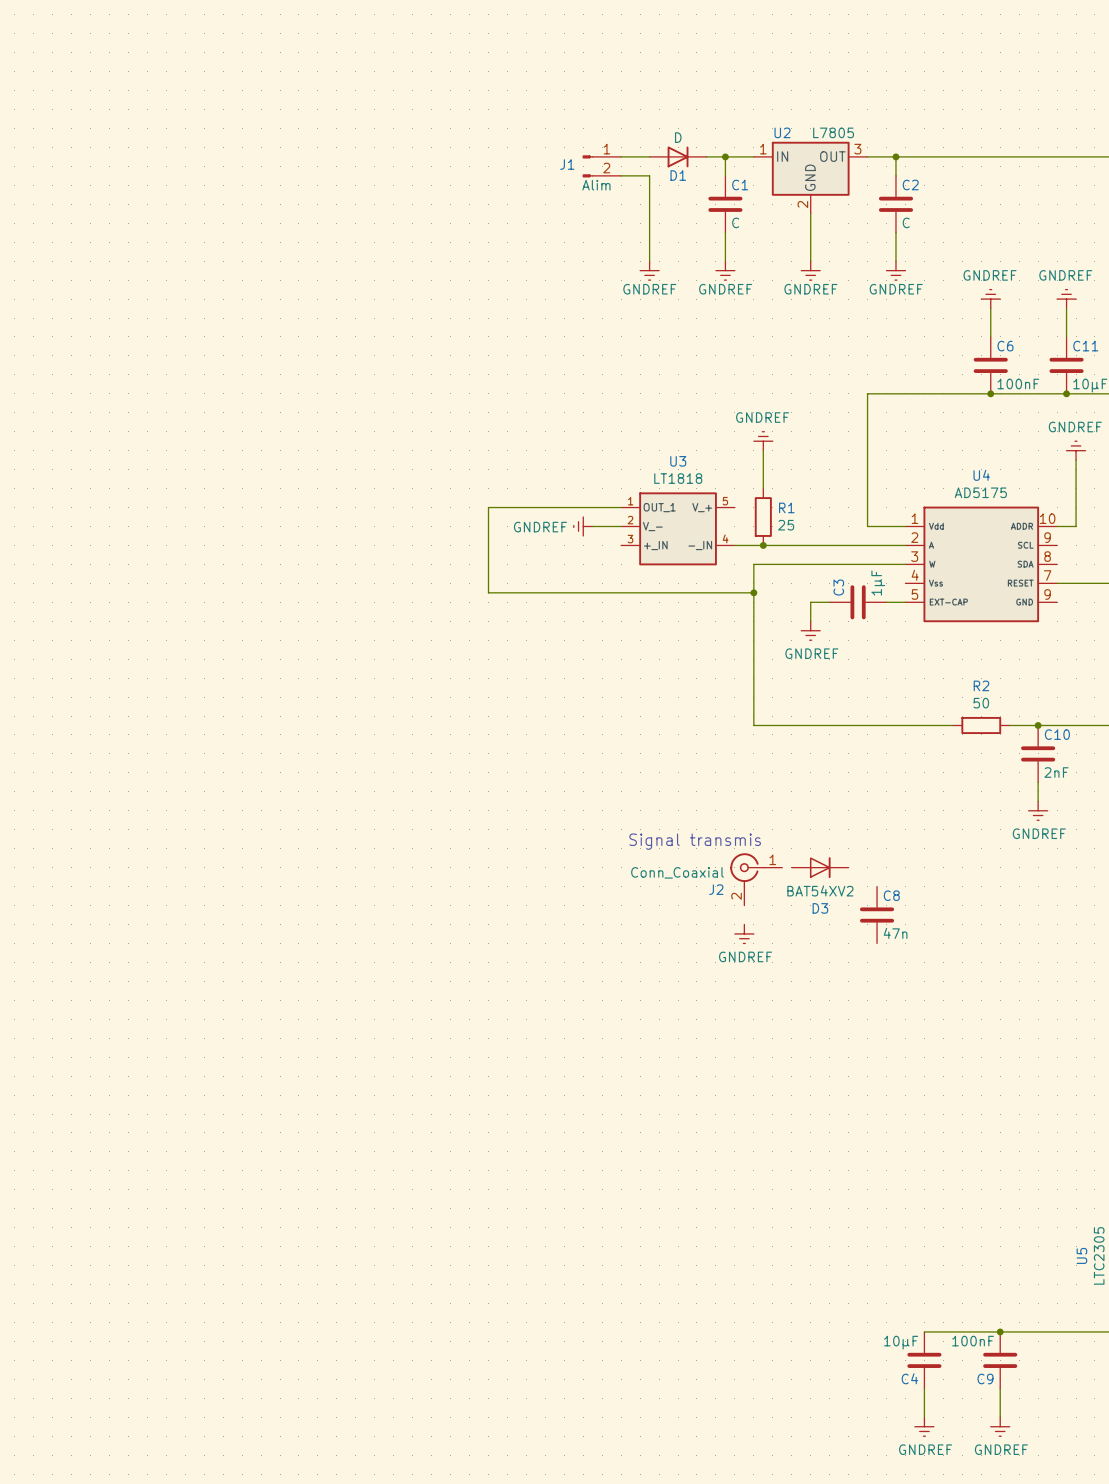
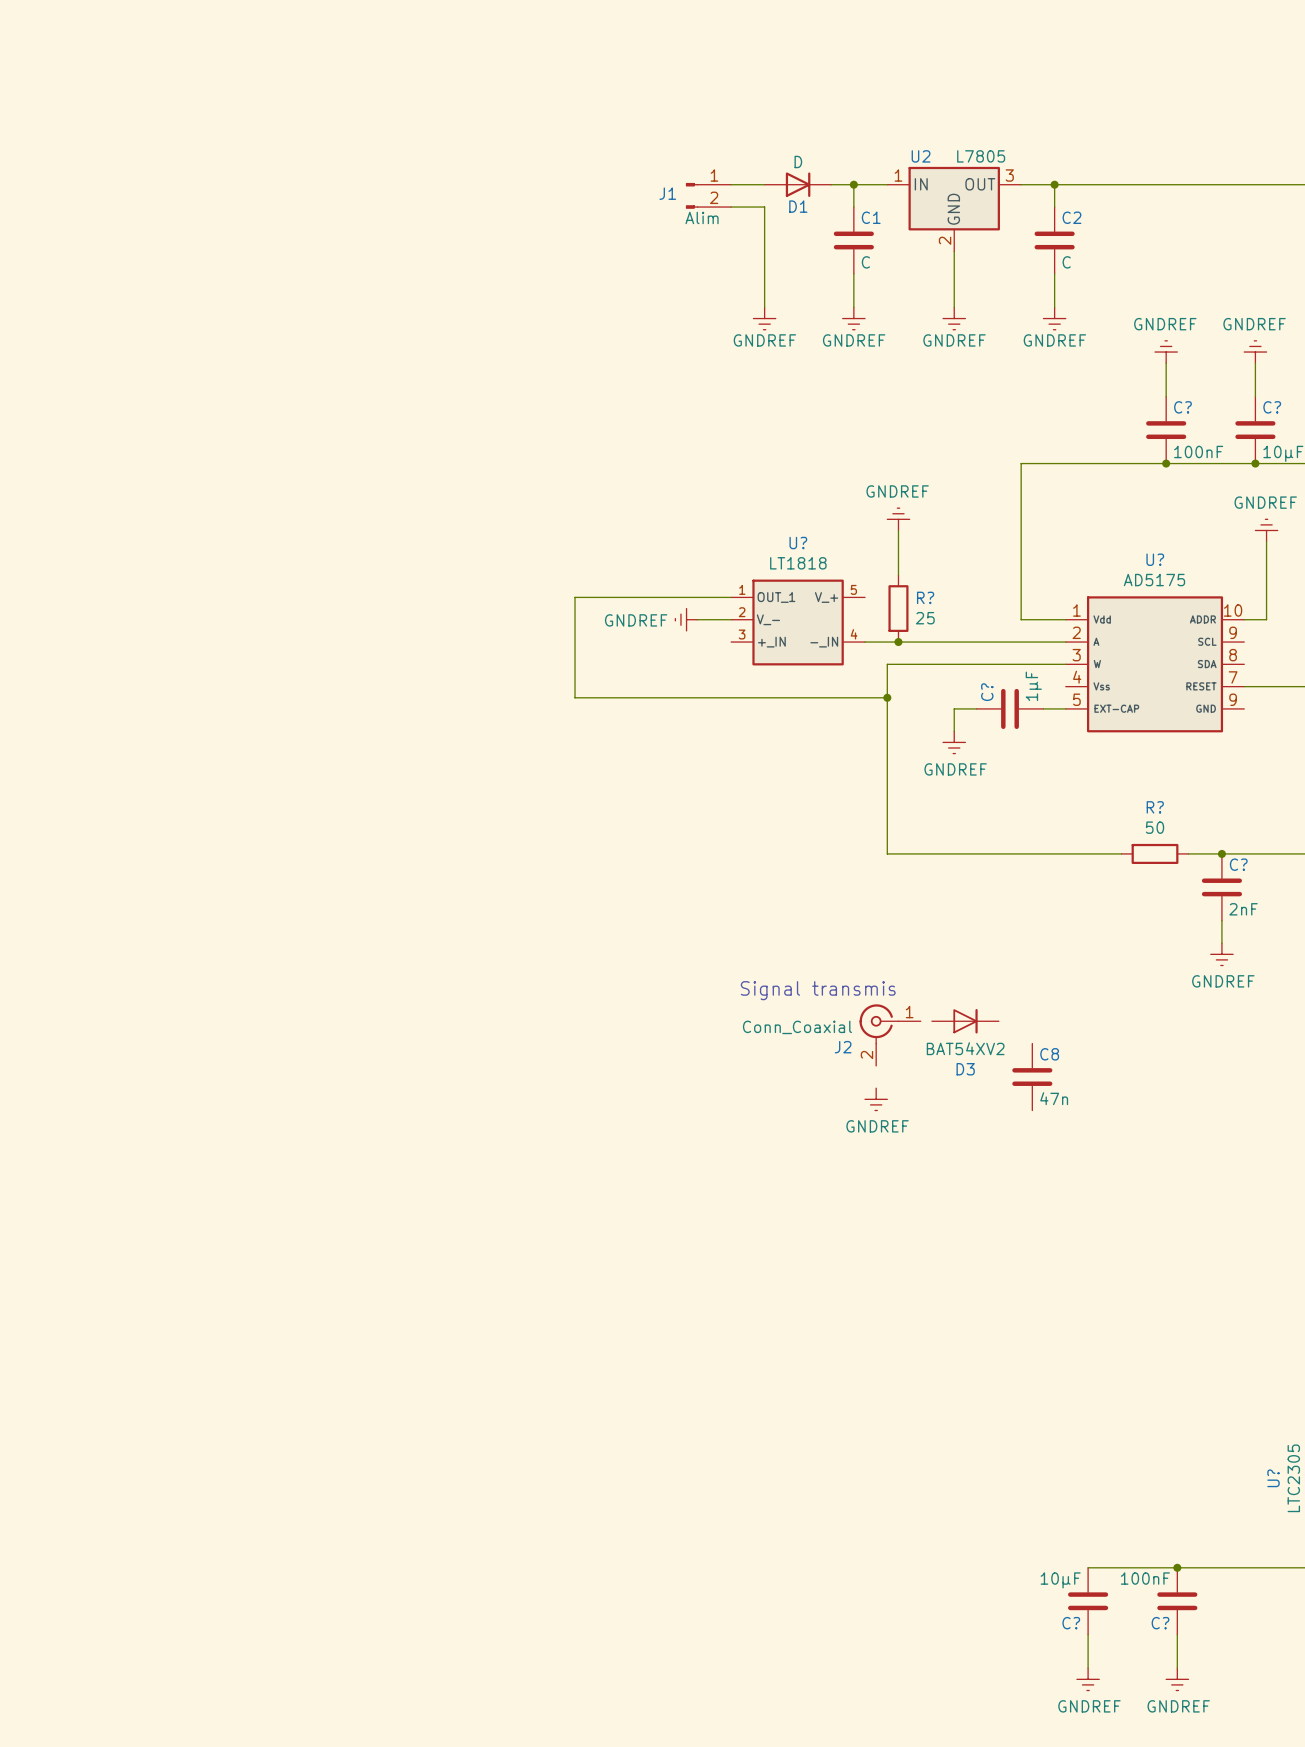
C6 name: C6 (1005, 346) -> C? (1182, 407)
C11 name: C11 (1085, 346) -> C? (1272, 407)
U3 name: U3 (678, 461) -> U? (798, 543)
U4 name: U4 (981, 475) -> U? (1155, 559)
R1 name: R1 (786, 507) -> R? (925, 597)
C3 name: C3 (838, 587) -> C? (987, 692)
R2 name: R2 (981, 685) -> R? (1155, 807)
C10 name: C10 (1057, 734) -> C? (1238, 864)
U5 name: U5 (1081, 1255) -> U? (1273, 1478)
C4 name: C4 (909, 1378) -> C? (1071, 1623)
C9 name: C9 (985, 1378) -> C? (1160, 1623)

